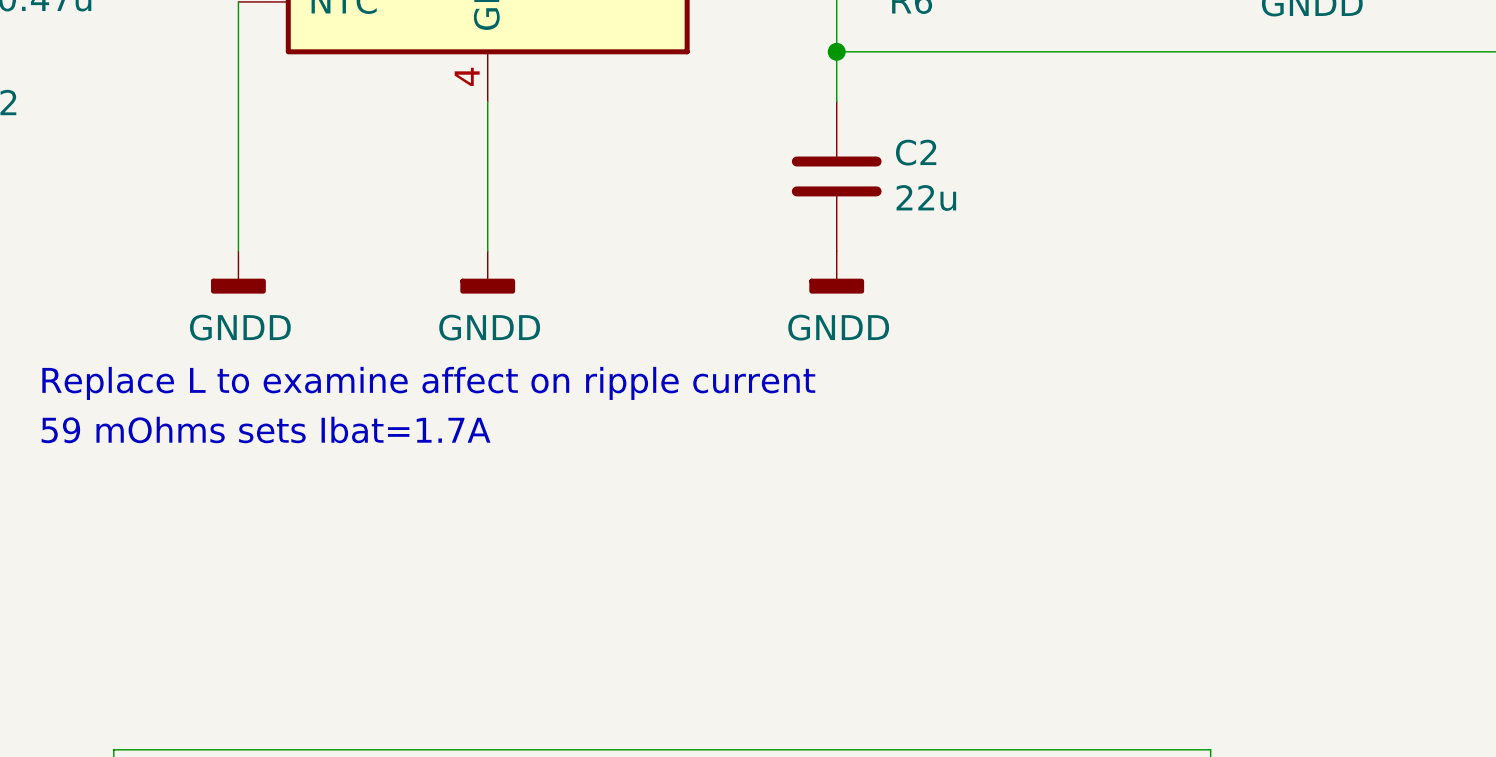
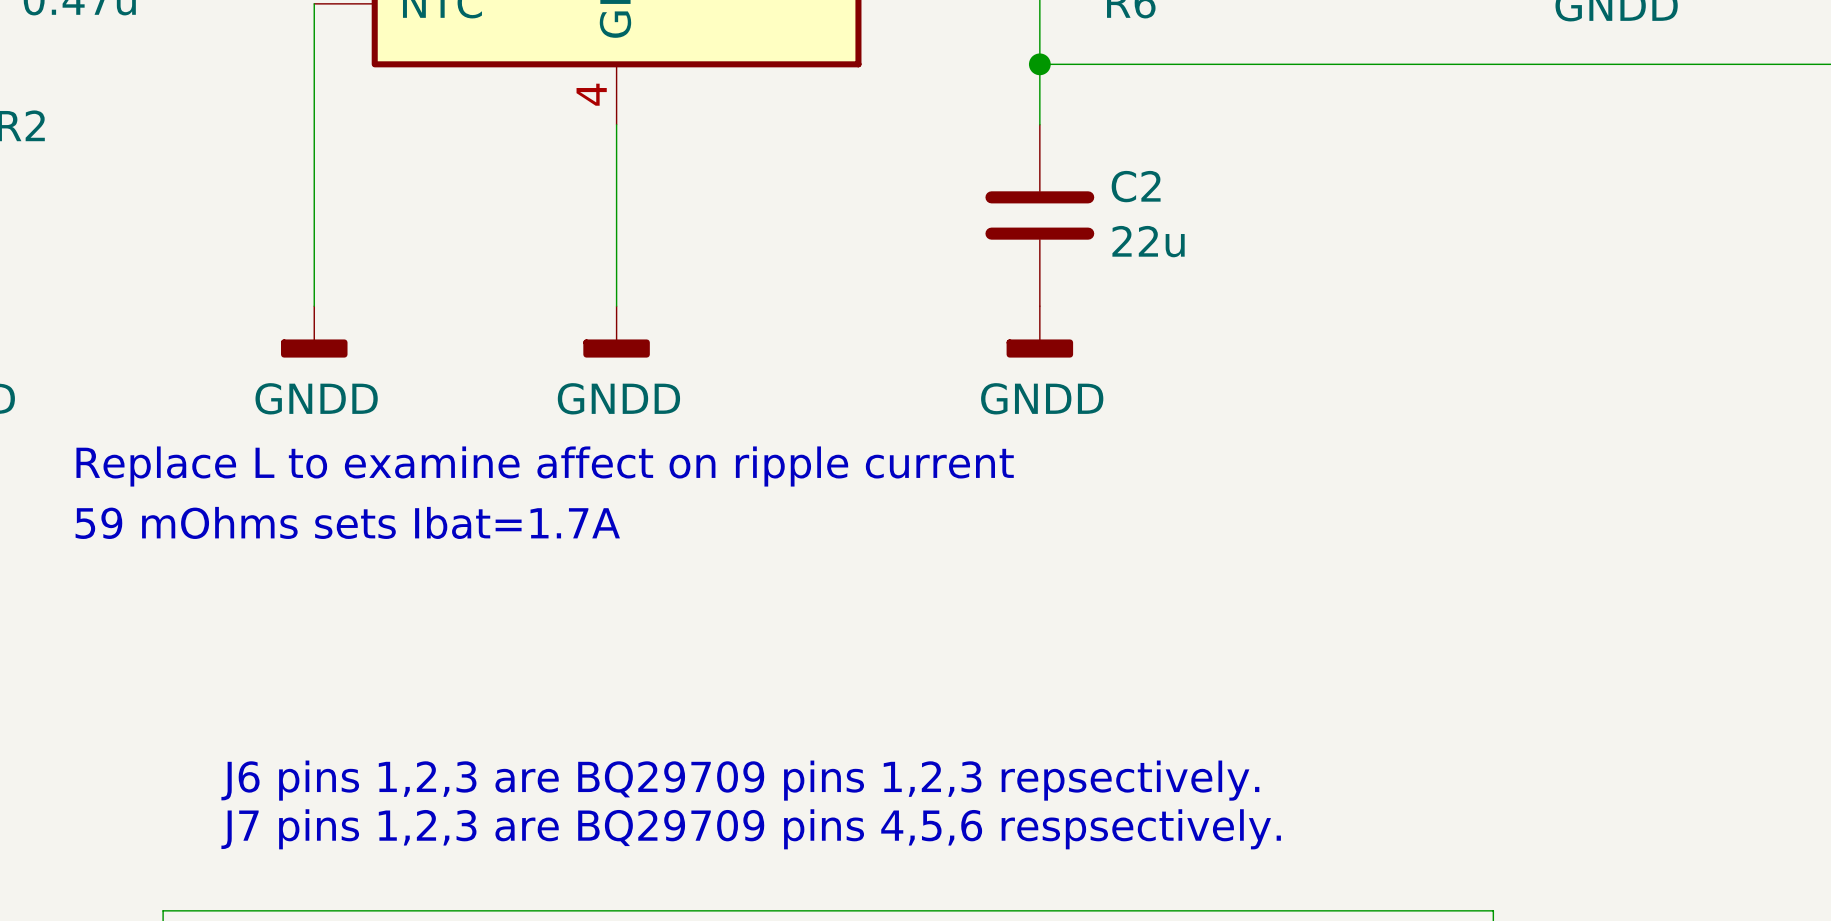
text: none -> J6 pins 1,2,3 are BQ29709 pins 1,2,3 repsectively. (740, 780)
text: none -> J7 pins 1,2,3 are BQ29709 pins 4,5,6 respsectively. (751, 829)

